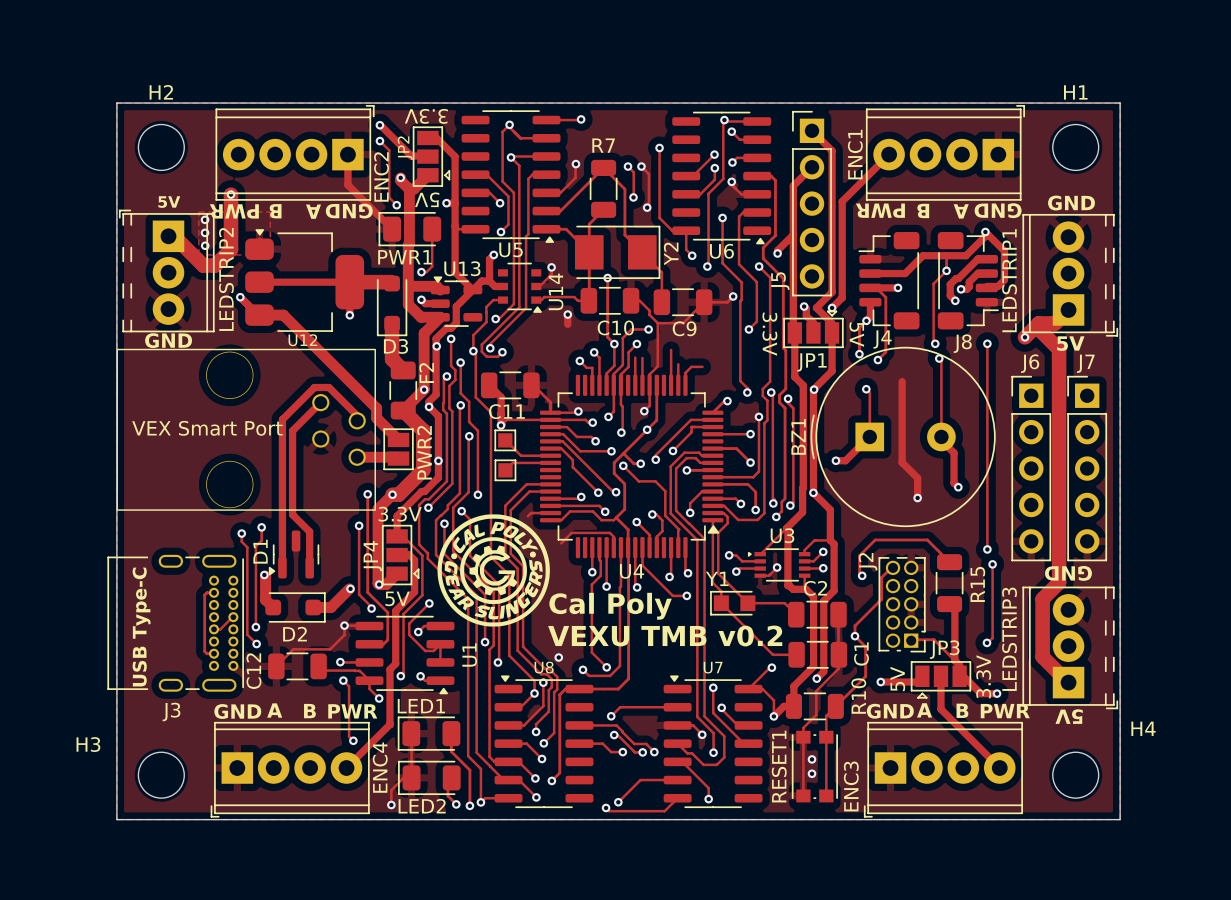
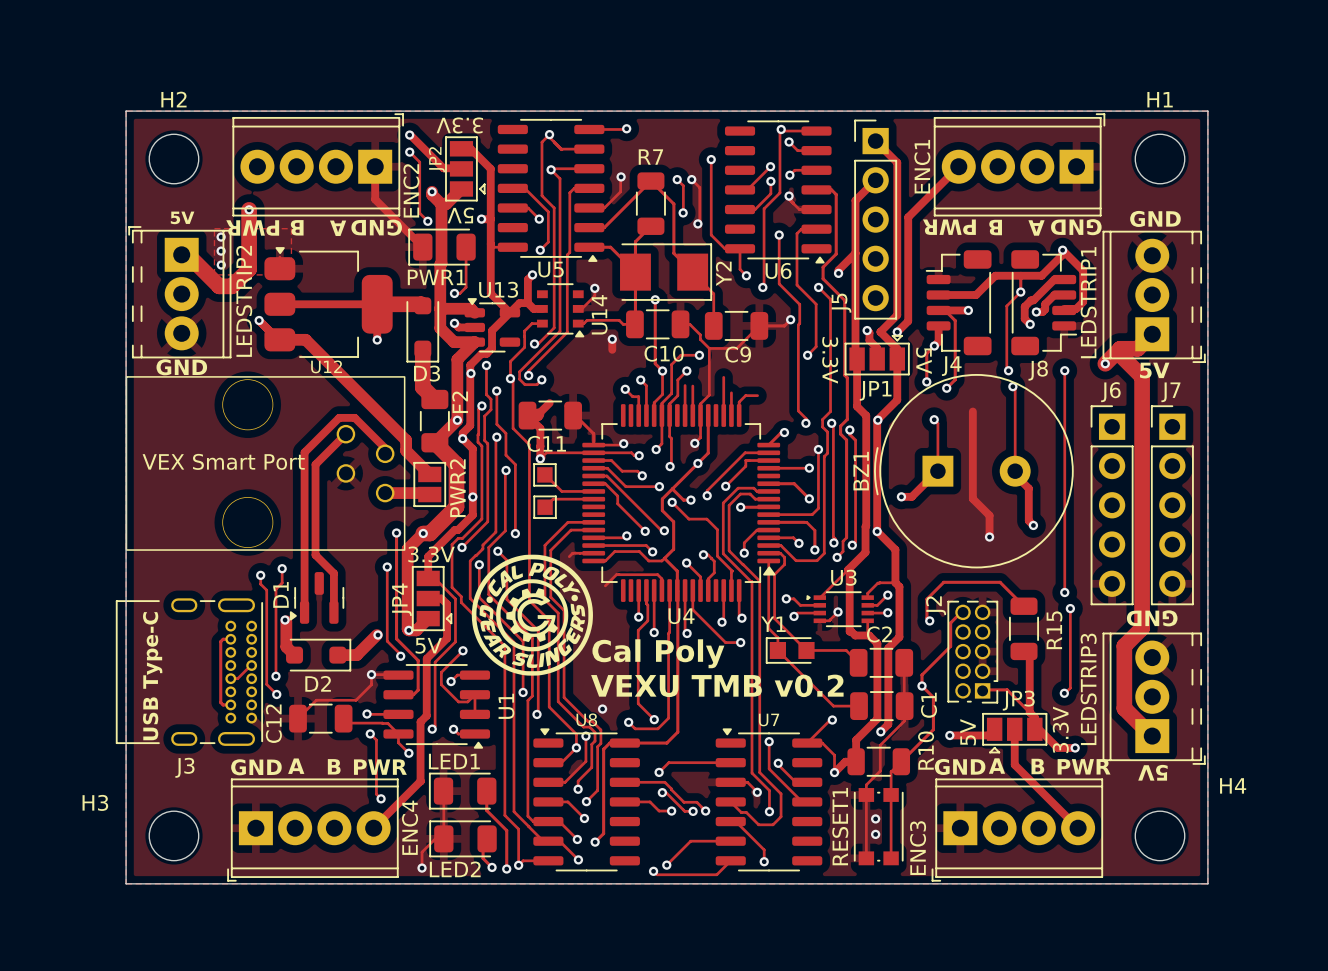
track: none -> (549, 403) (537, 415) (527, 415)

